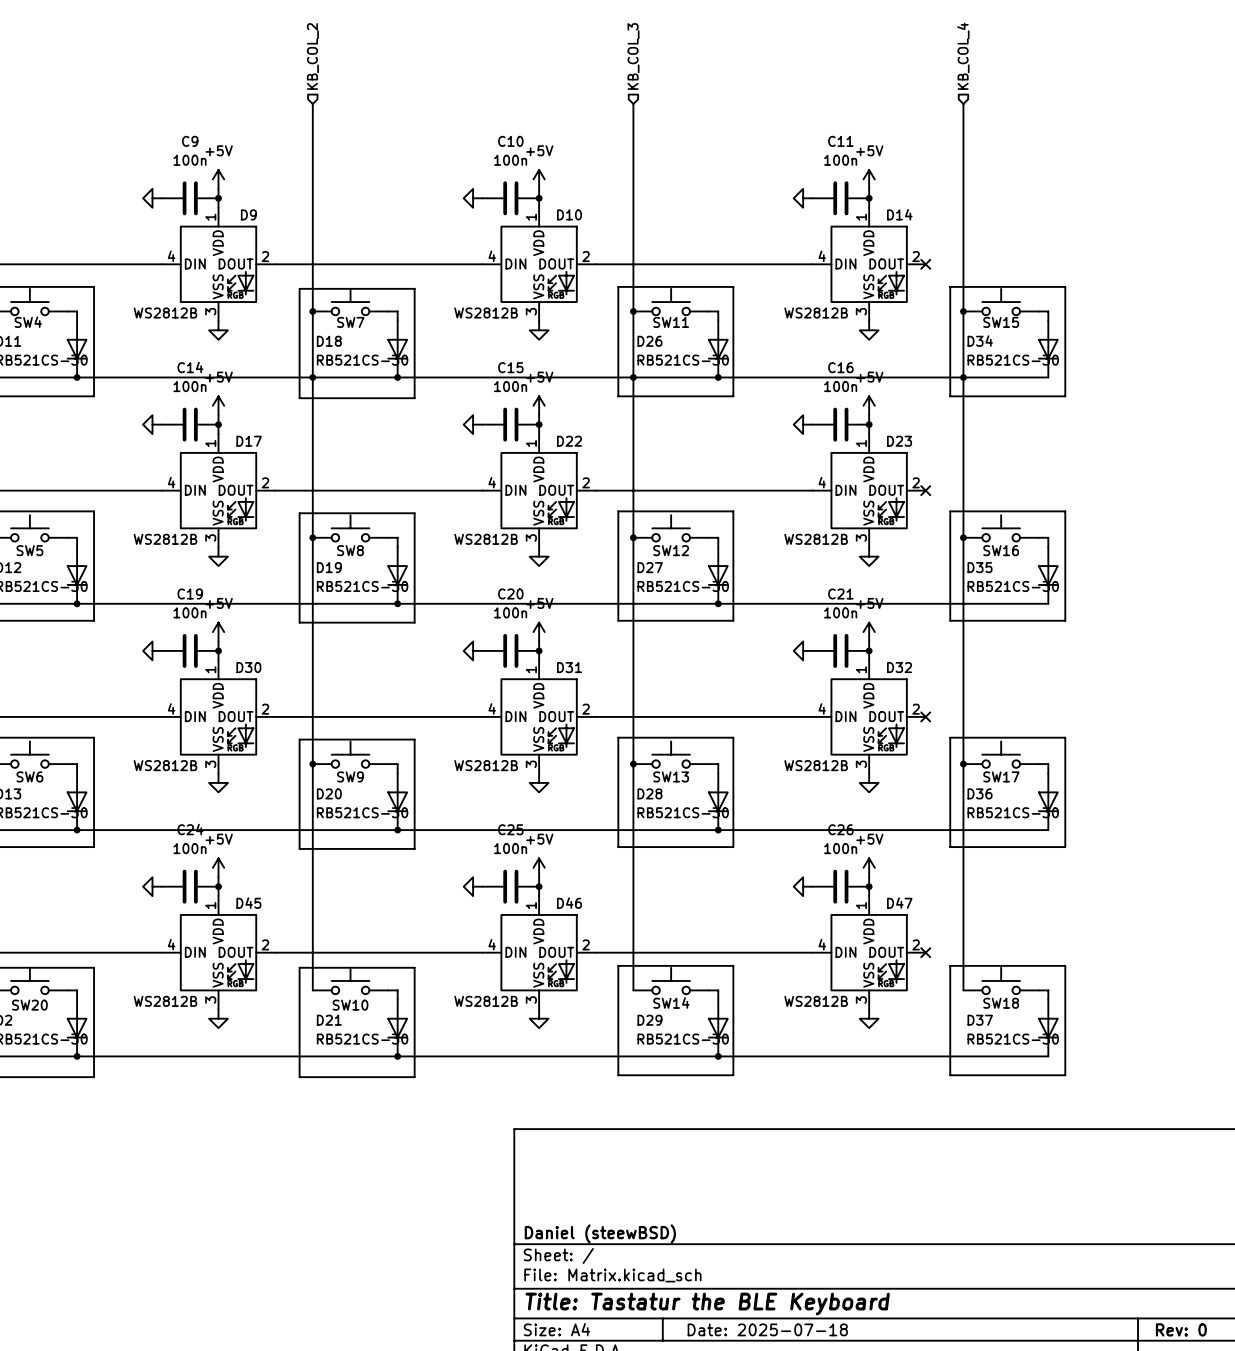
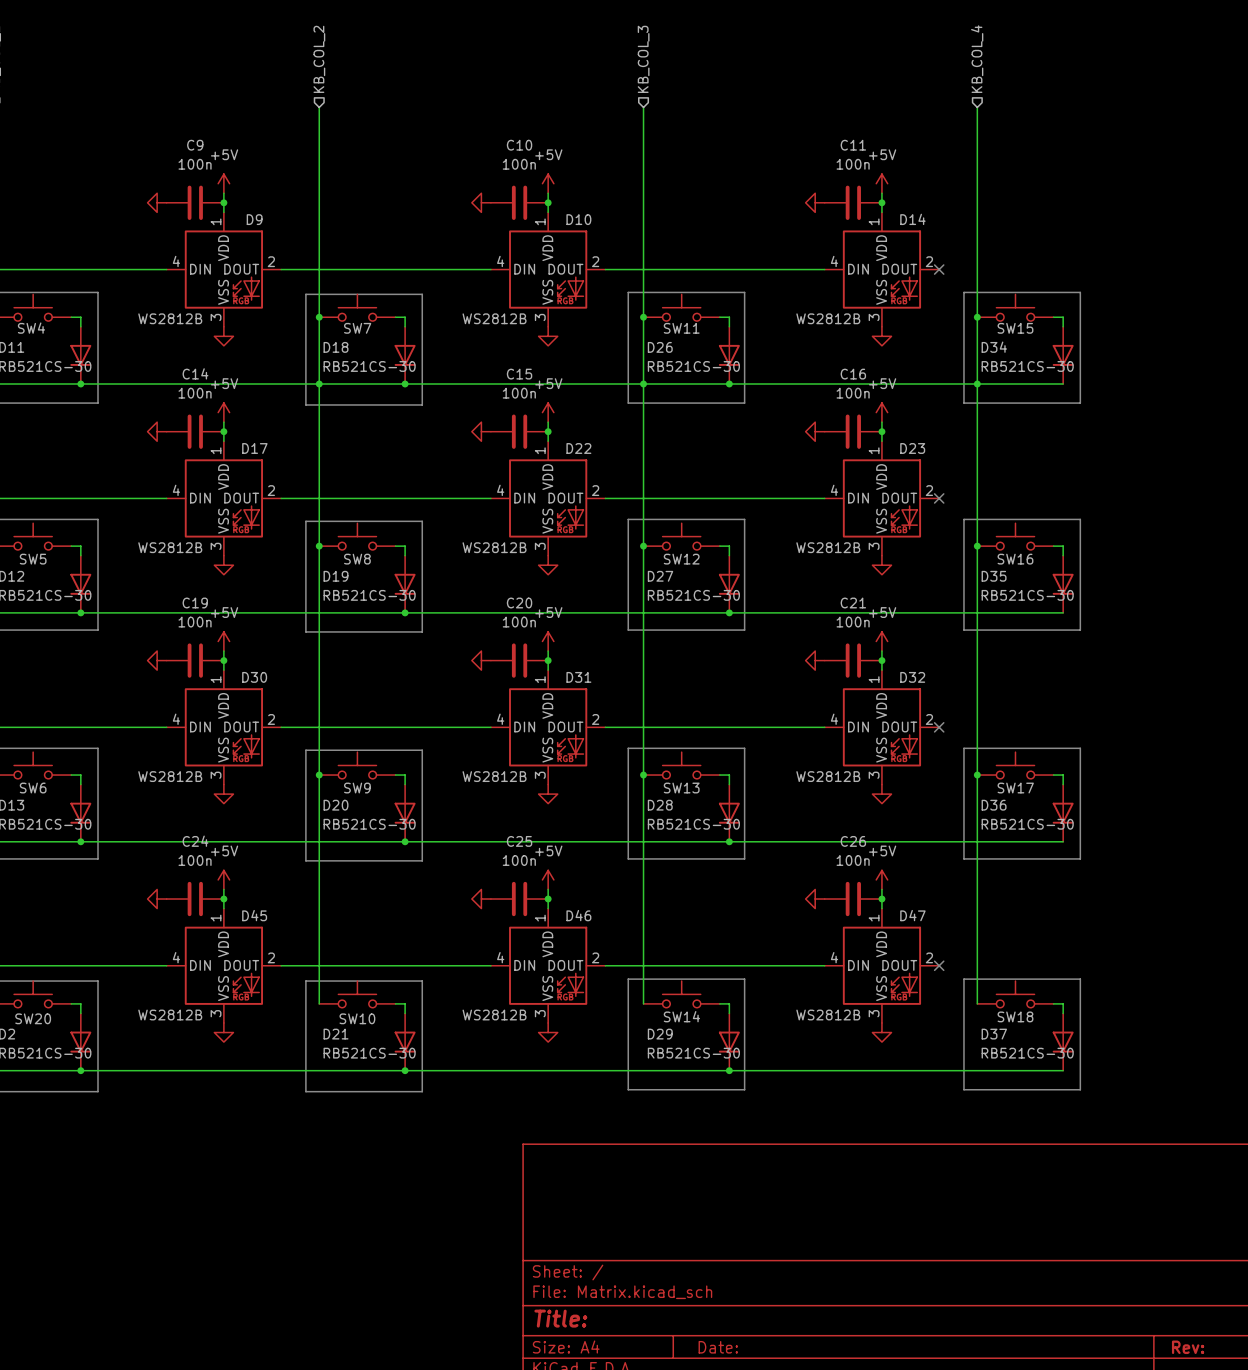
title block: Daniel (steewBSD) (600, 1233) -> none
title block: Title: Tastatur the BLE Keyboard (707, 1304) -> Title: (560, 1318)
title block: Date: 2025-07-18 (767, 1329) -> Date: (718, 1347)
title block: Rev: 0 (1181, 1329) -> Rev: (1188, 1347)

